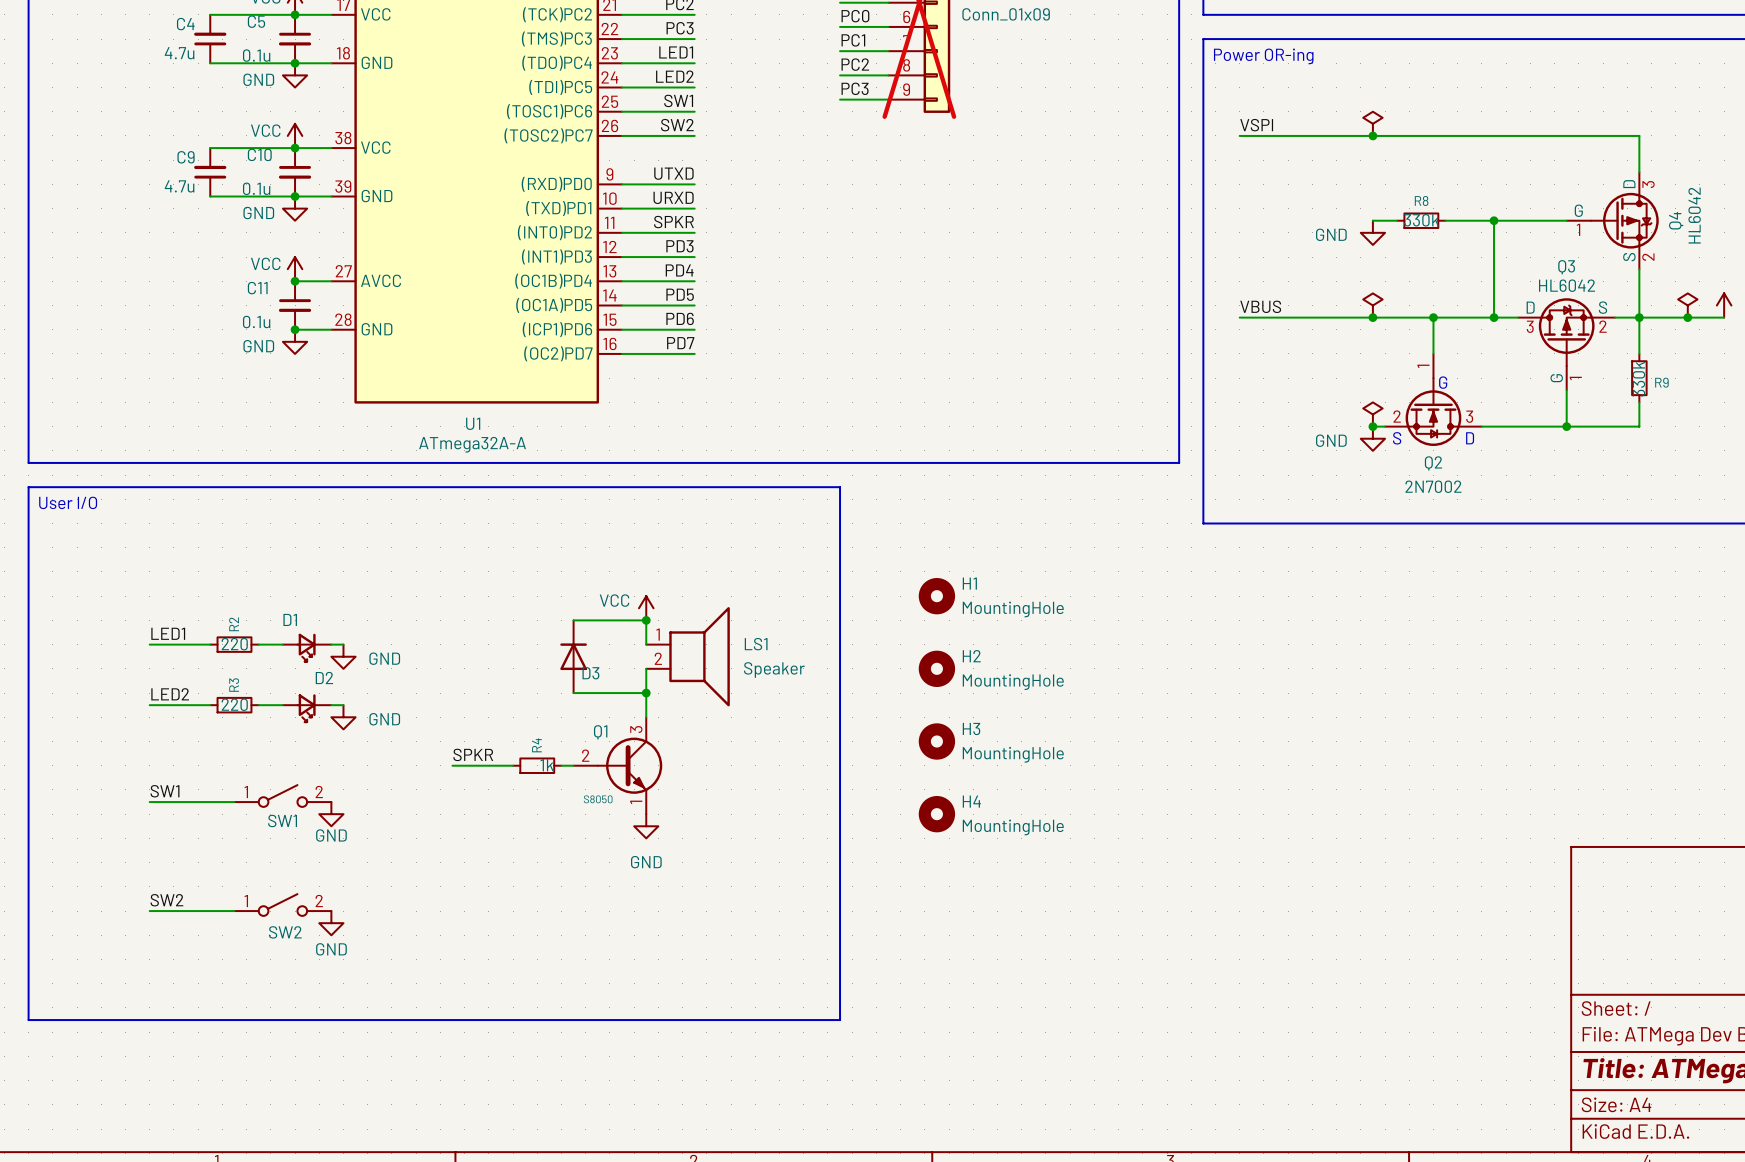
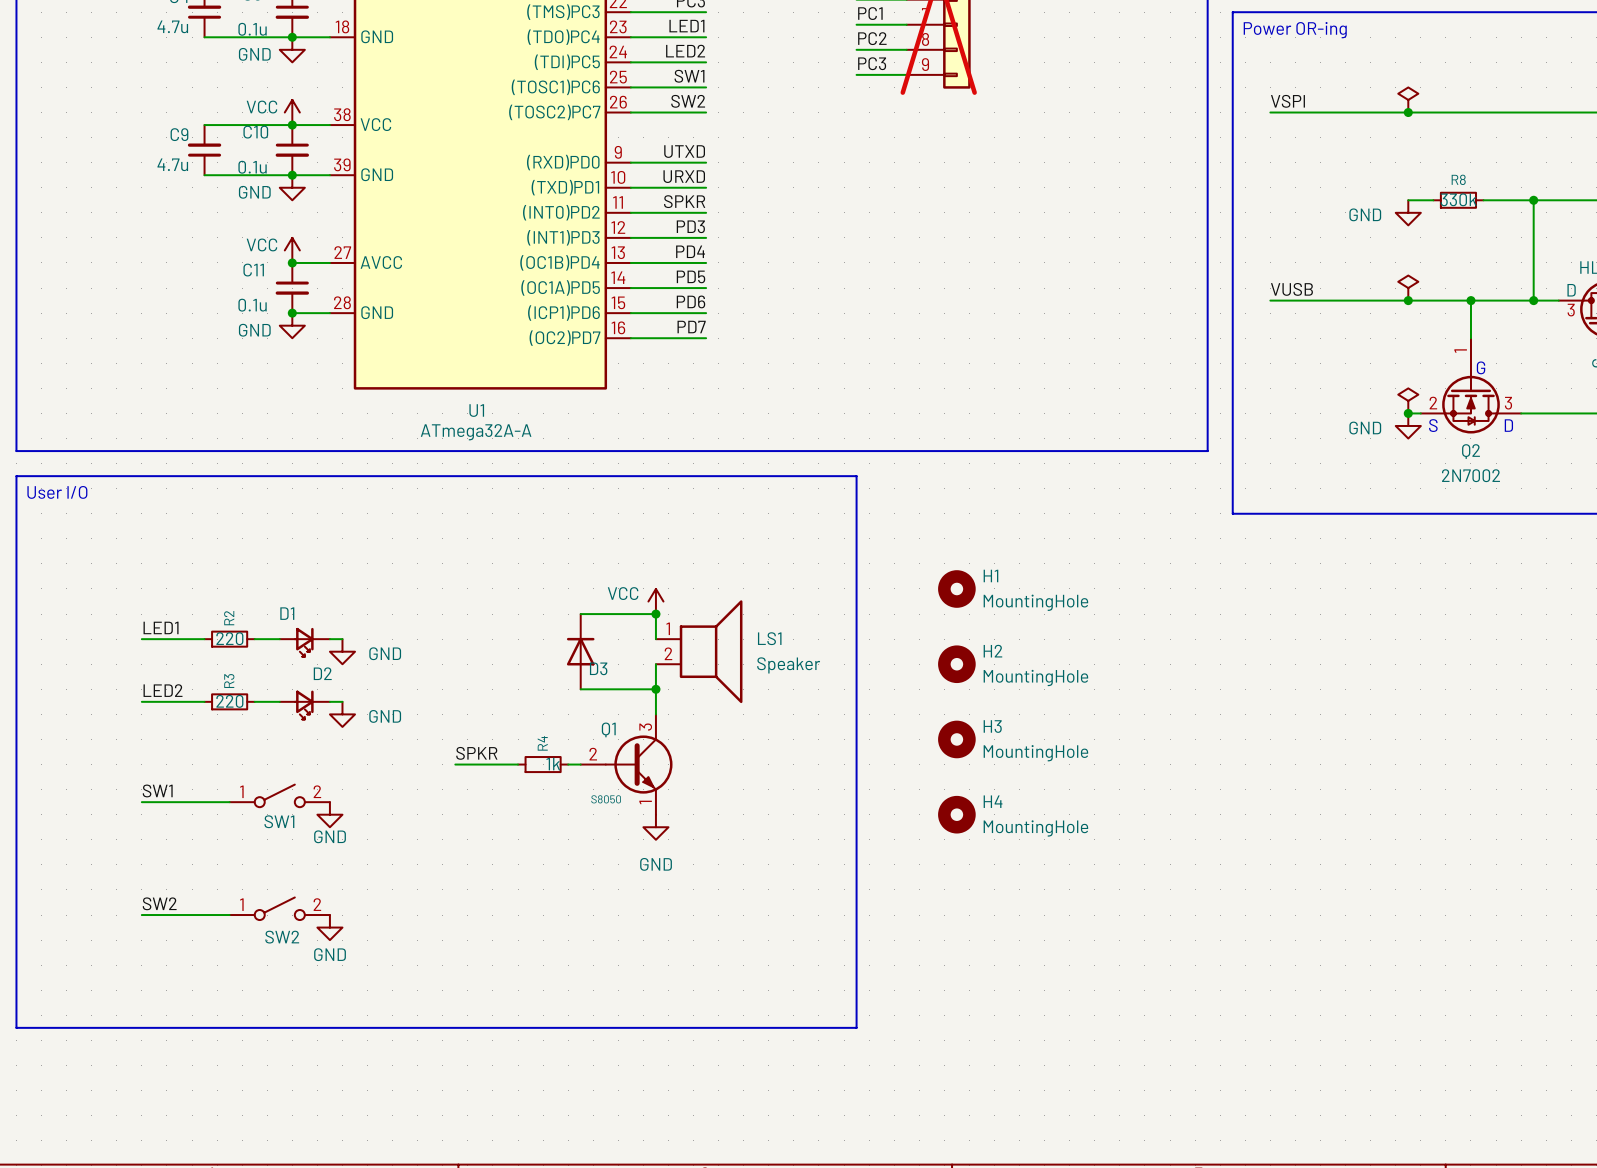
label: VBUS (1260, 306) -> VUSB (1291, 289)

